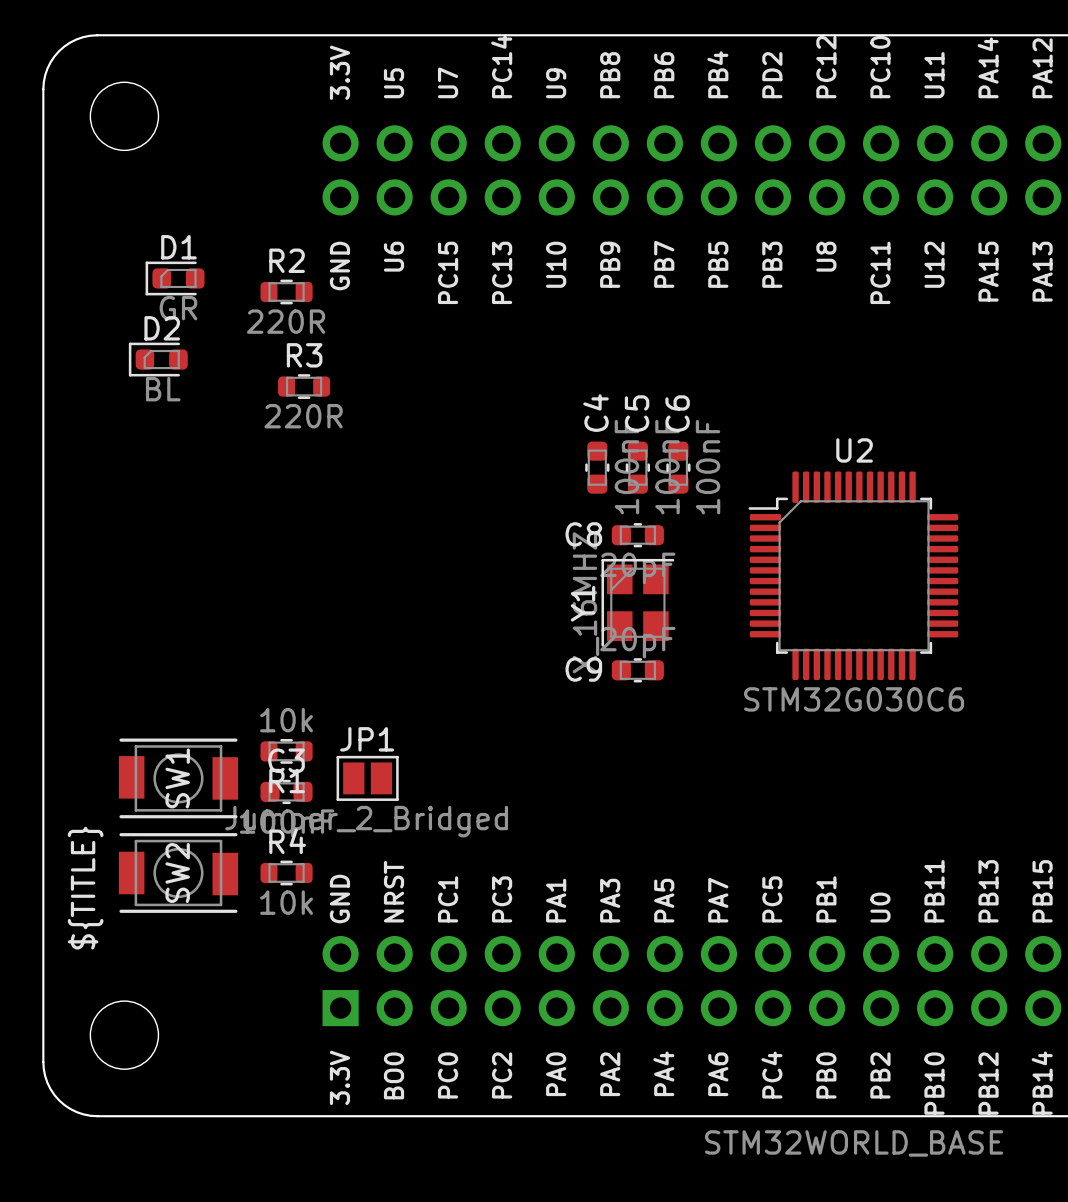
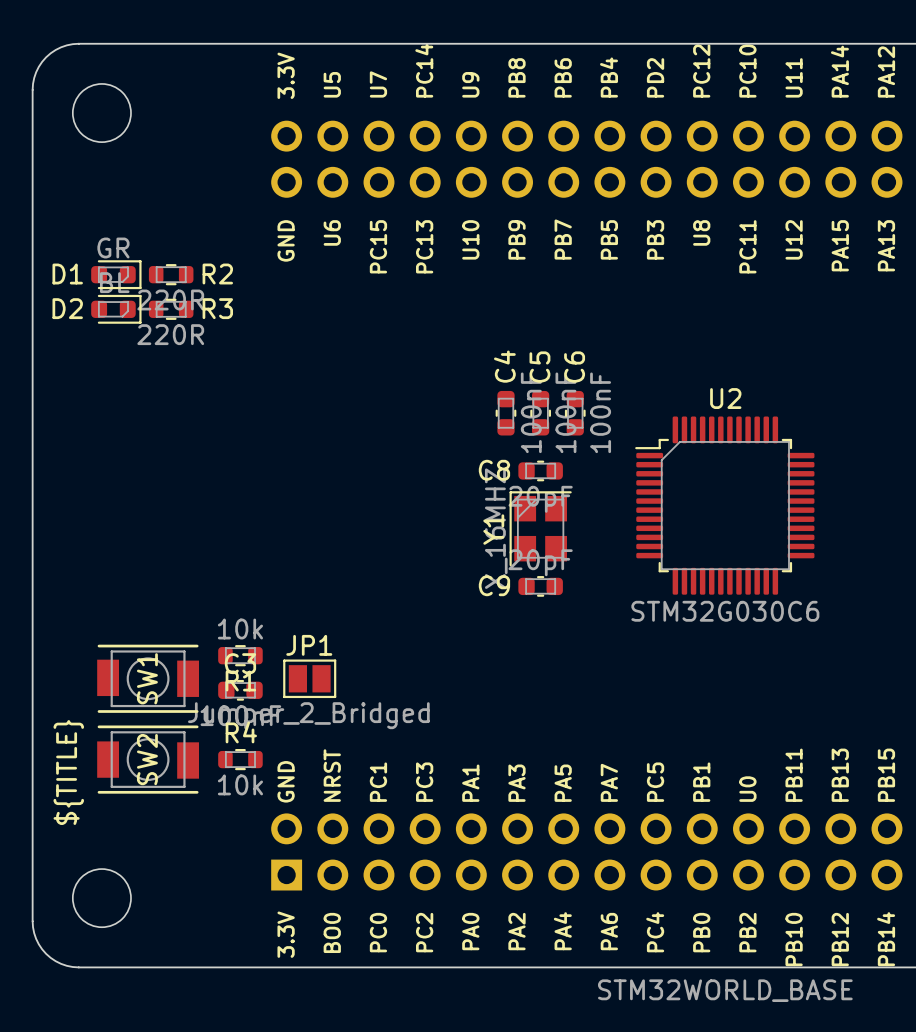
D1 name position: D1 (178, 247) -> D1 (67, 274)
R2 name position: R2 (287, 260) -> R2 (217, 274)
D1 rotation: 0° (175, 278) -> 180° (116, 274)
D1 position: (175, 278) -> (116, 274)
R2 position: (286, 291) -> (171, 274)
D2 name position: D2 (162, 328) -> D2 (67, 308)
R3 name position: R3 (304, 355) -> R3 (217, 308)
D2 rotation: 0° (158, 359) -> 180° (116, 309)
R3 position: (304, 386) -> (171, 309)

